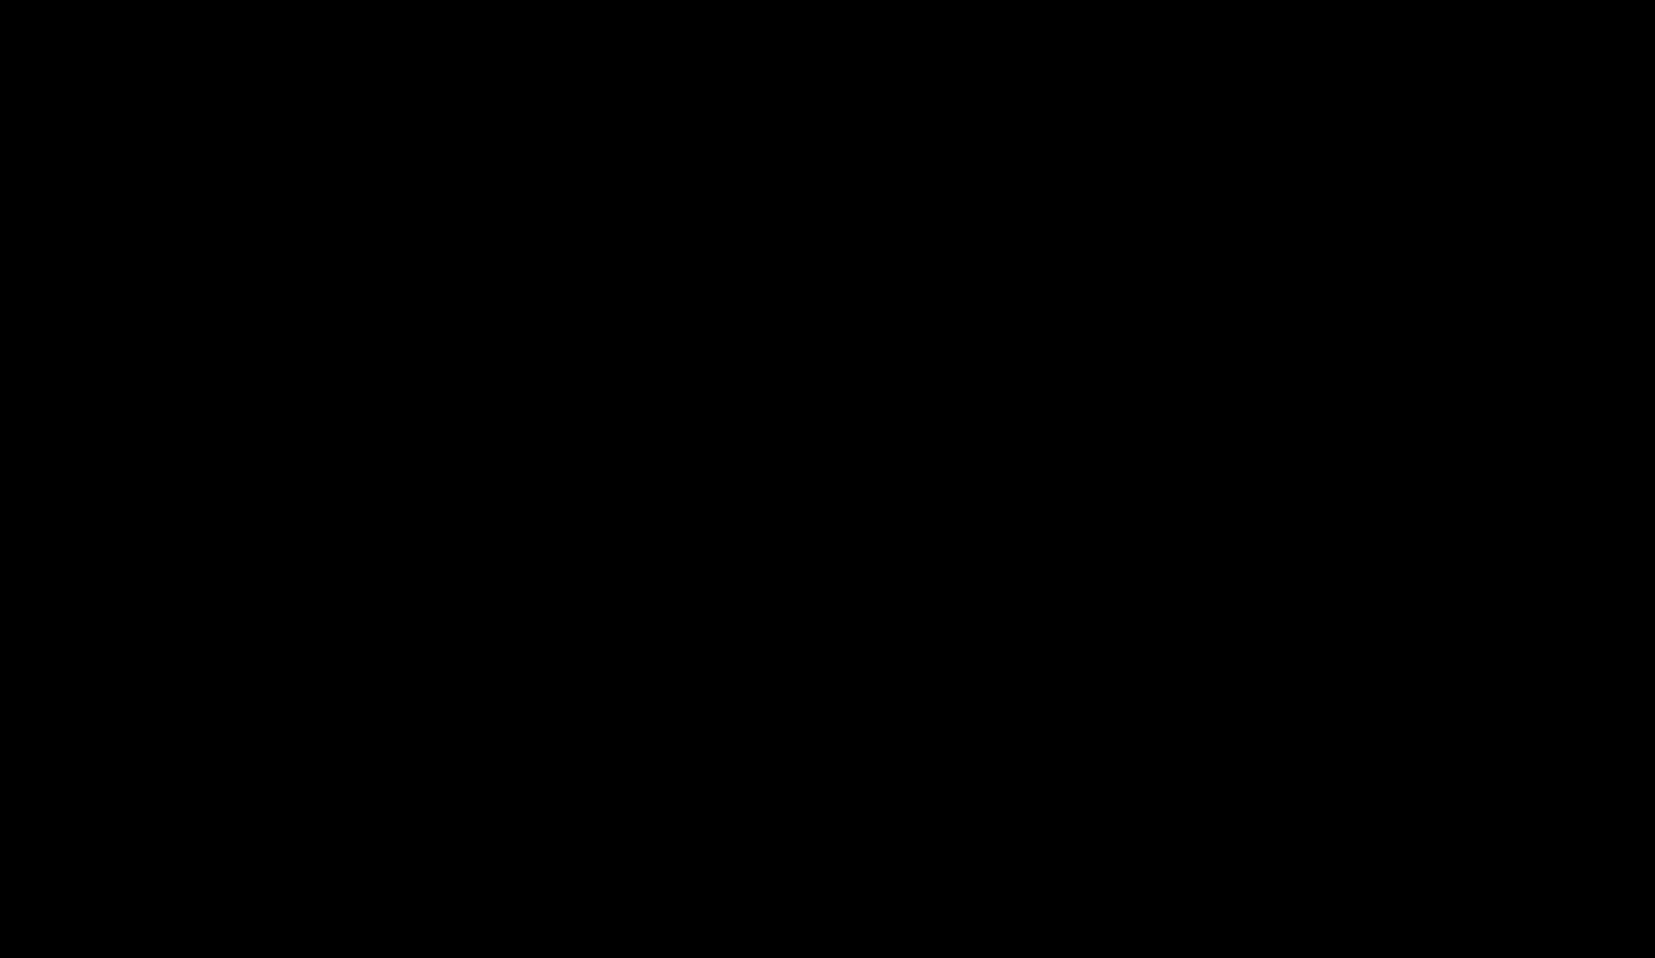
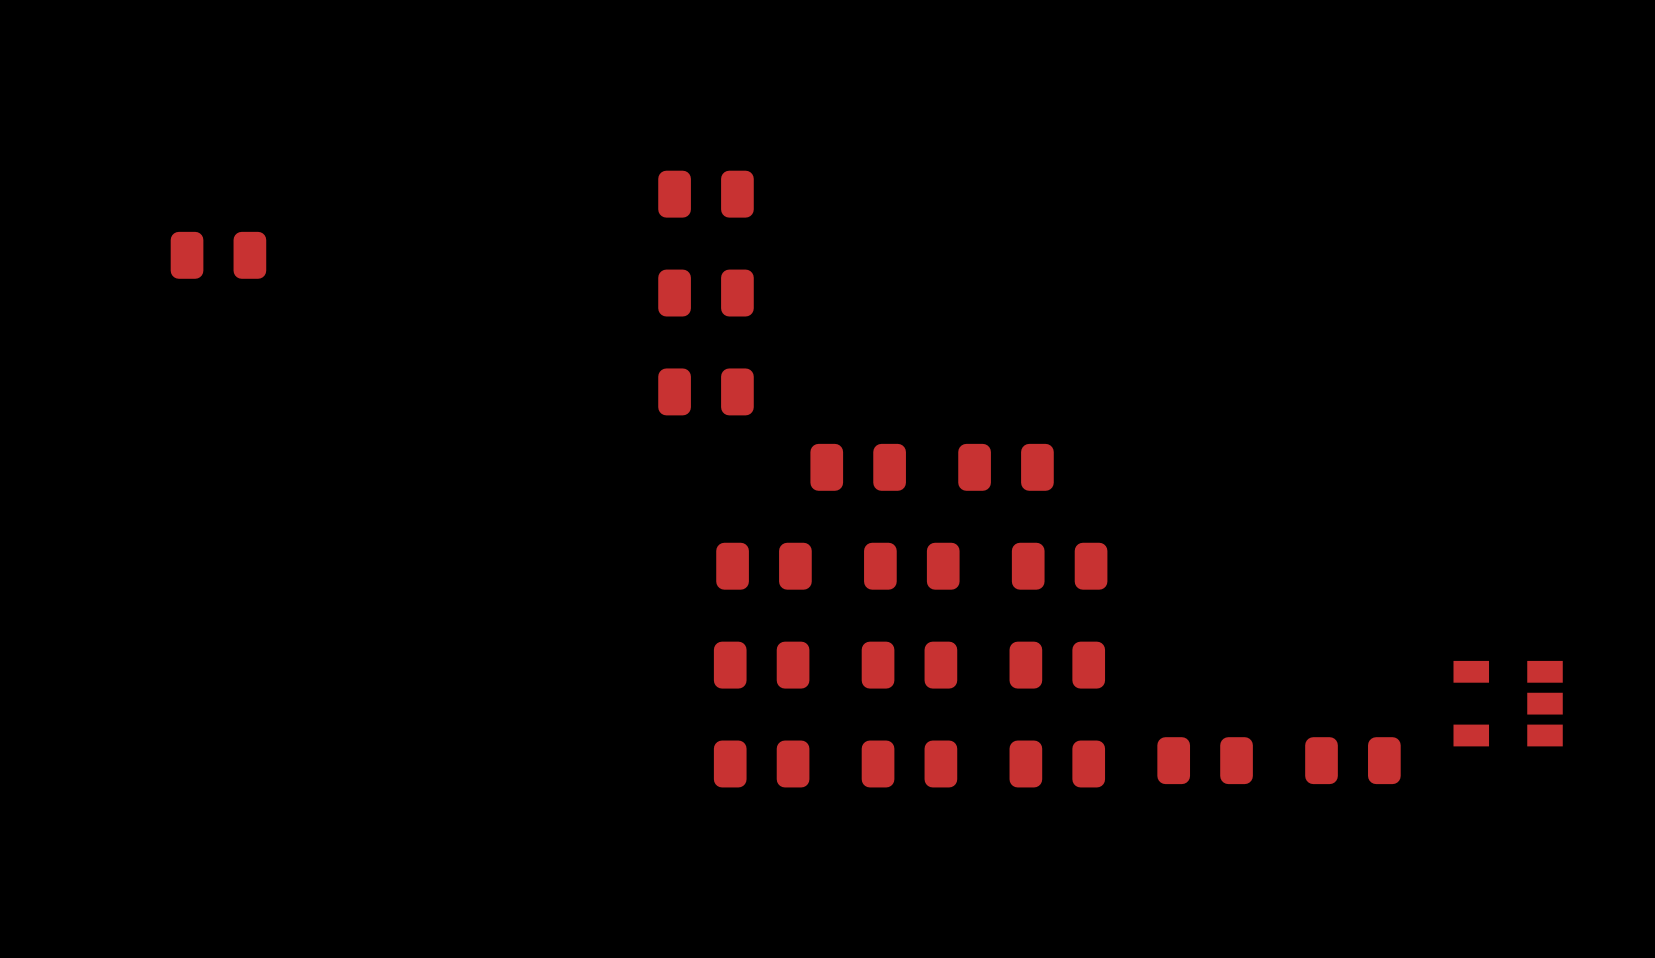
part: none -> (706, 194)
part: none -> (218, 255)
part: none -> (706, 293)
part: none -> (706, 391)
part: none -> (858, 467)
part: none -> (1006, 467)
part: none -> (763, 566)
part: none -> (911, 566)
part: none -> (1059, 566)
part: none -> (761, 665)
part: none -> (909, 665)
part: none -> (1057, 665)
part: none -> (1508, 703)
part: none -> (1205, 760)
part: none -> (1352, 760)
part: none -> (761, 763)
part: none -> (909, 763)
part: none -> (1057, 763)

